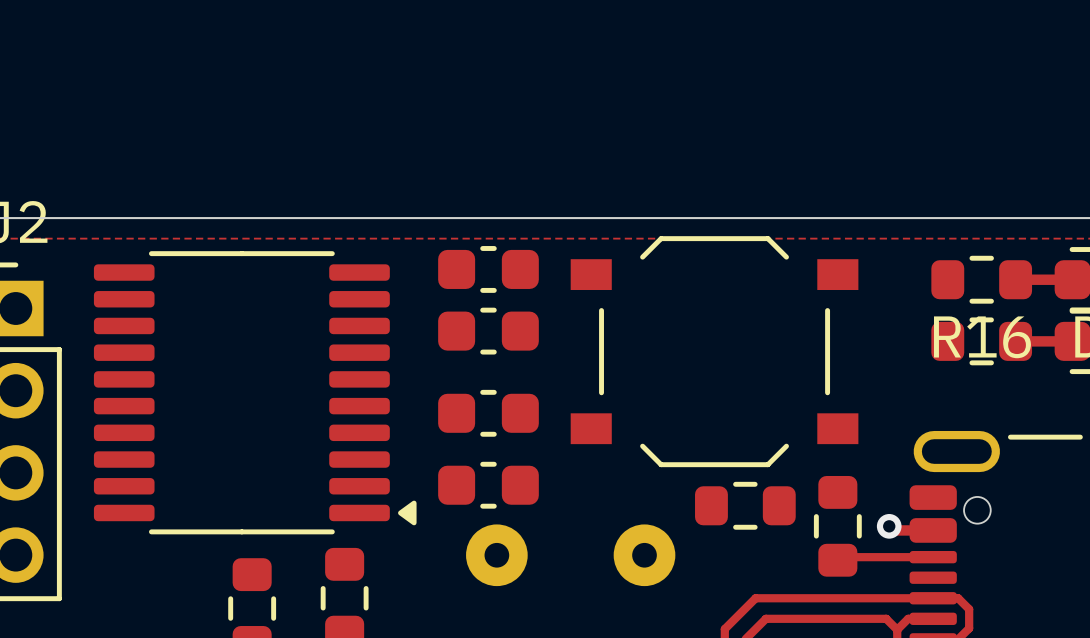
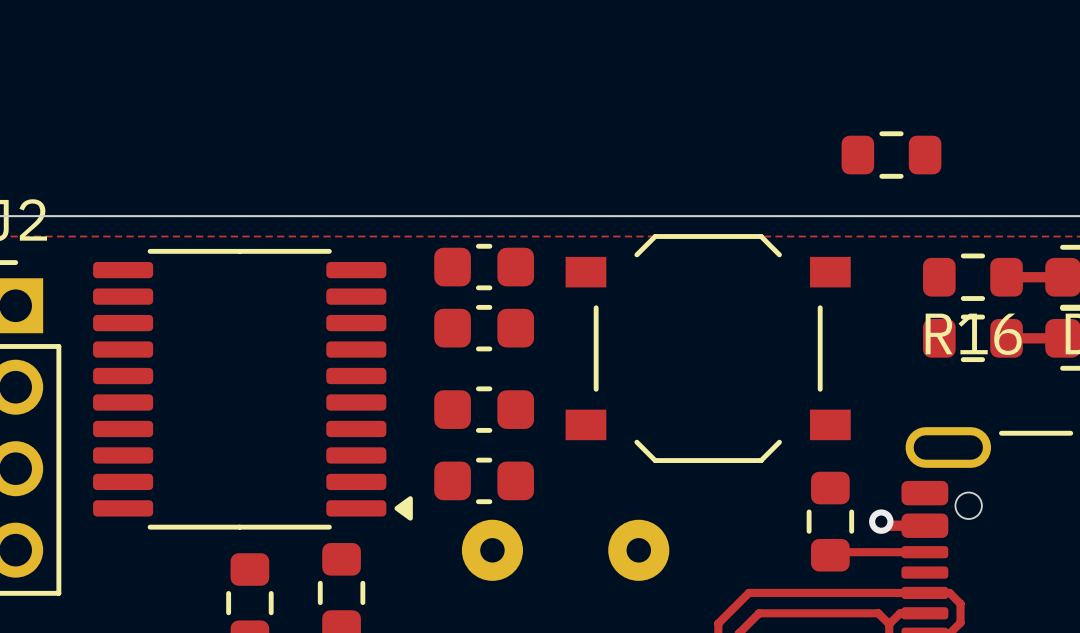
part: none -> (891, 155)
part: (745, 505) -> none

